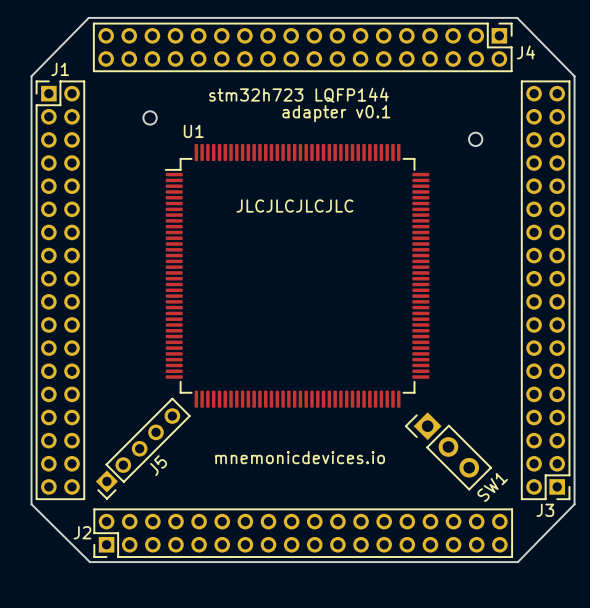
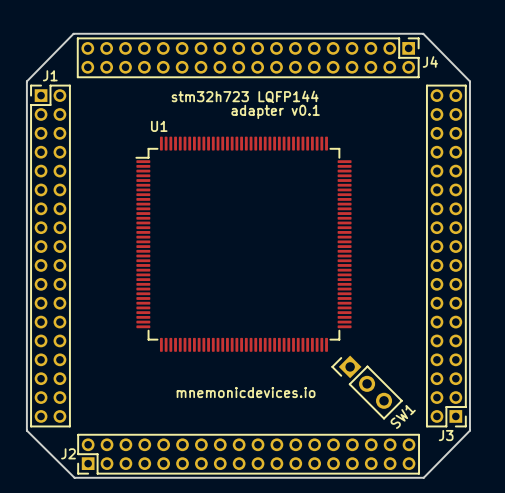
round board edge: [142, 110, 158, 126] -> none
round board edge: [468, 132, 483, 147] -> none
text: JLCJLCJLCJLC (294, 206) -> none
J5: (143, 448) -> none

